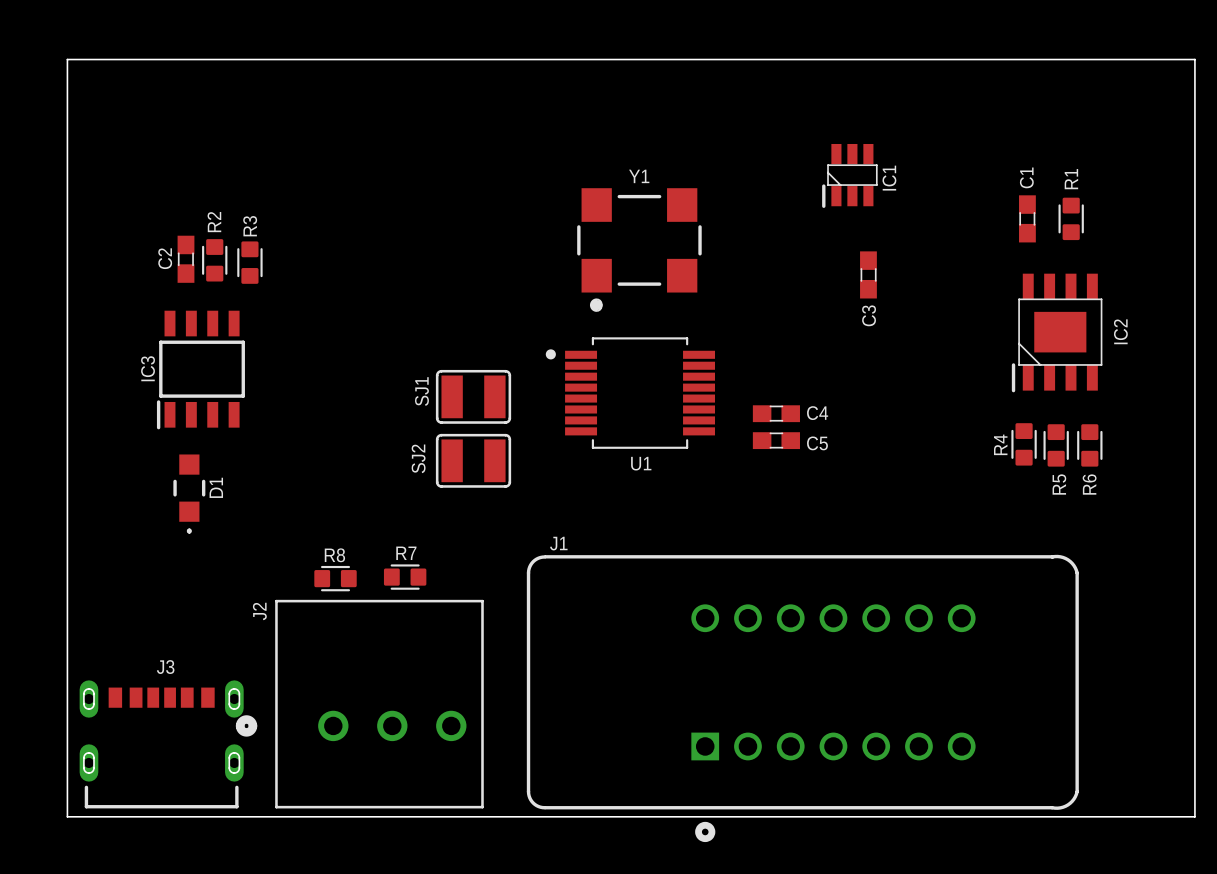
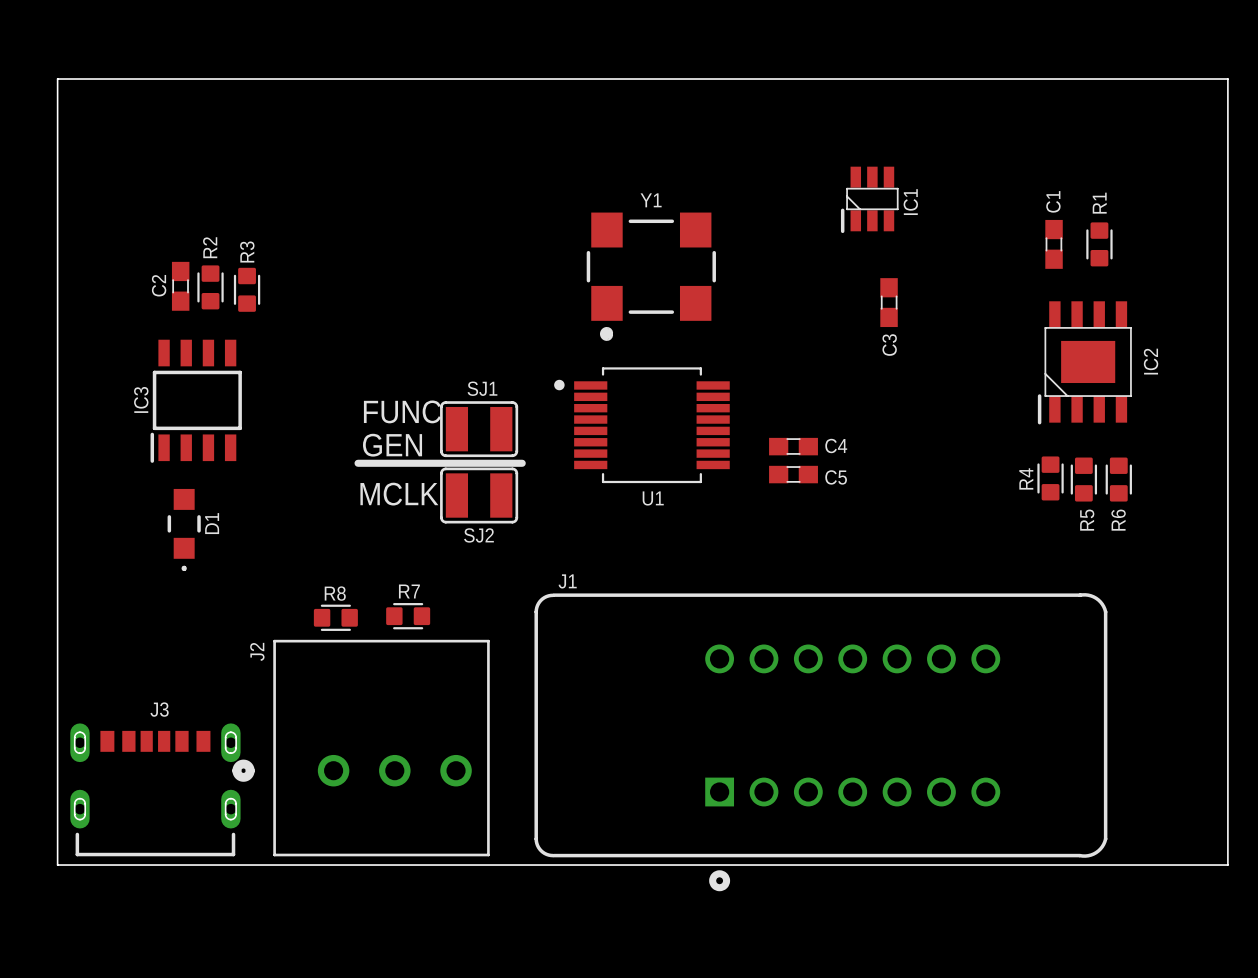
text: none -> FUNC (402, 411)
SJ1 name rotation: 0° (421, 391) -> 90° clockwise (482, 388)
SJ1 name position: SJ1 (421, 391) -> SJ1 (482, 388)
text: none -> GEN (392, 445)
line: none -> (358, 463) (522, 463)
SJ2 name rotation: 0° (418, 458) -> 90° clockwise (478, 535)
SJ2 name position: SJ2 (418, 458) -> SJ2 (478, 535)
text: none -> MCLK (399, 494)

